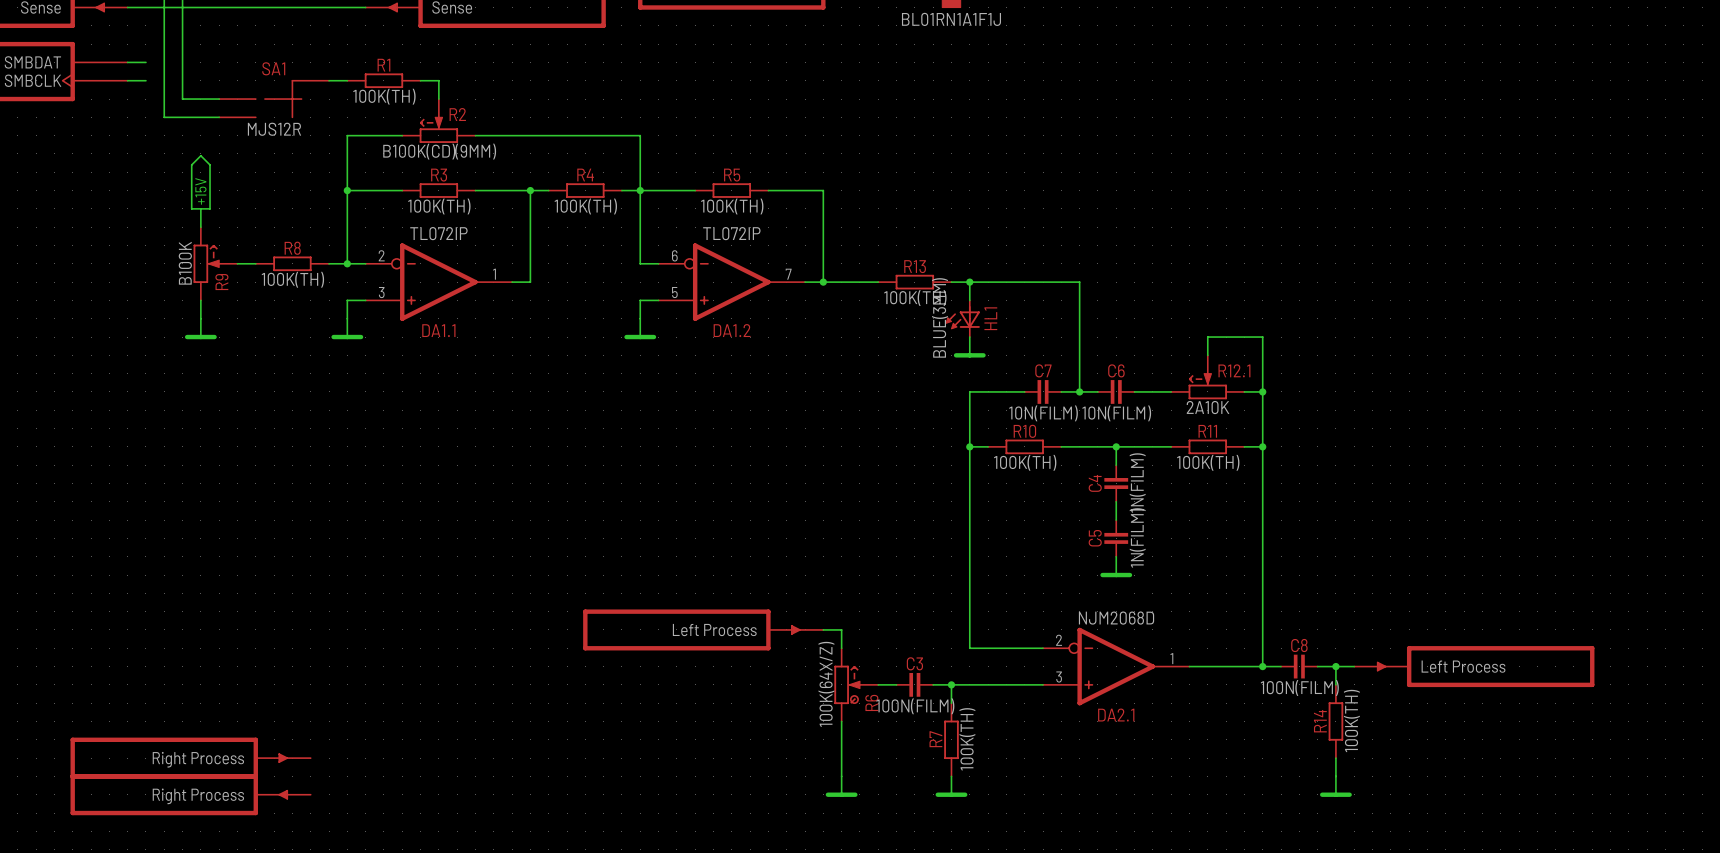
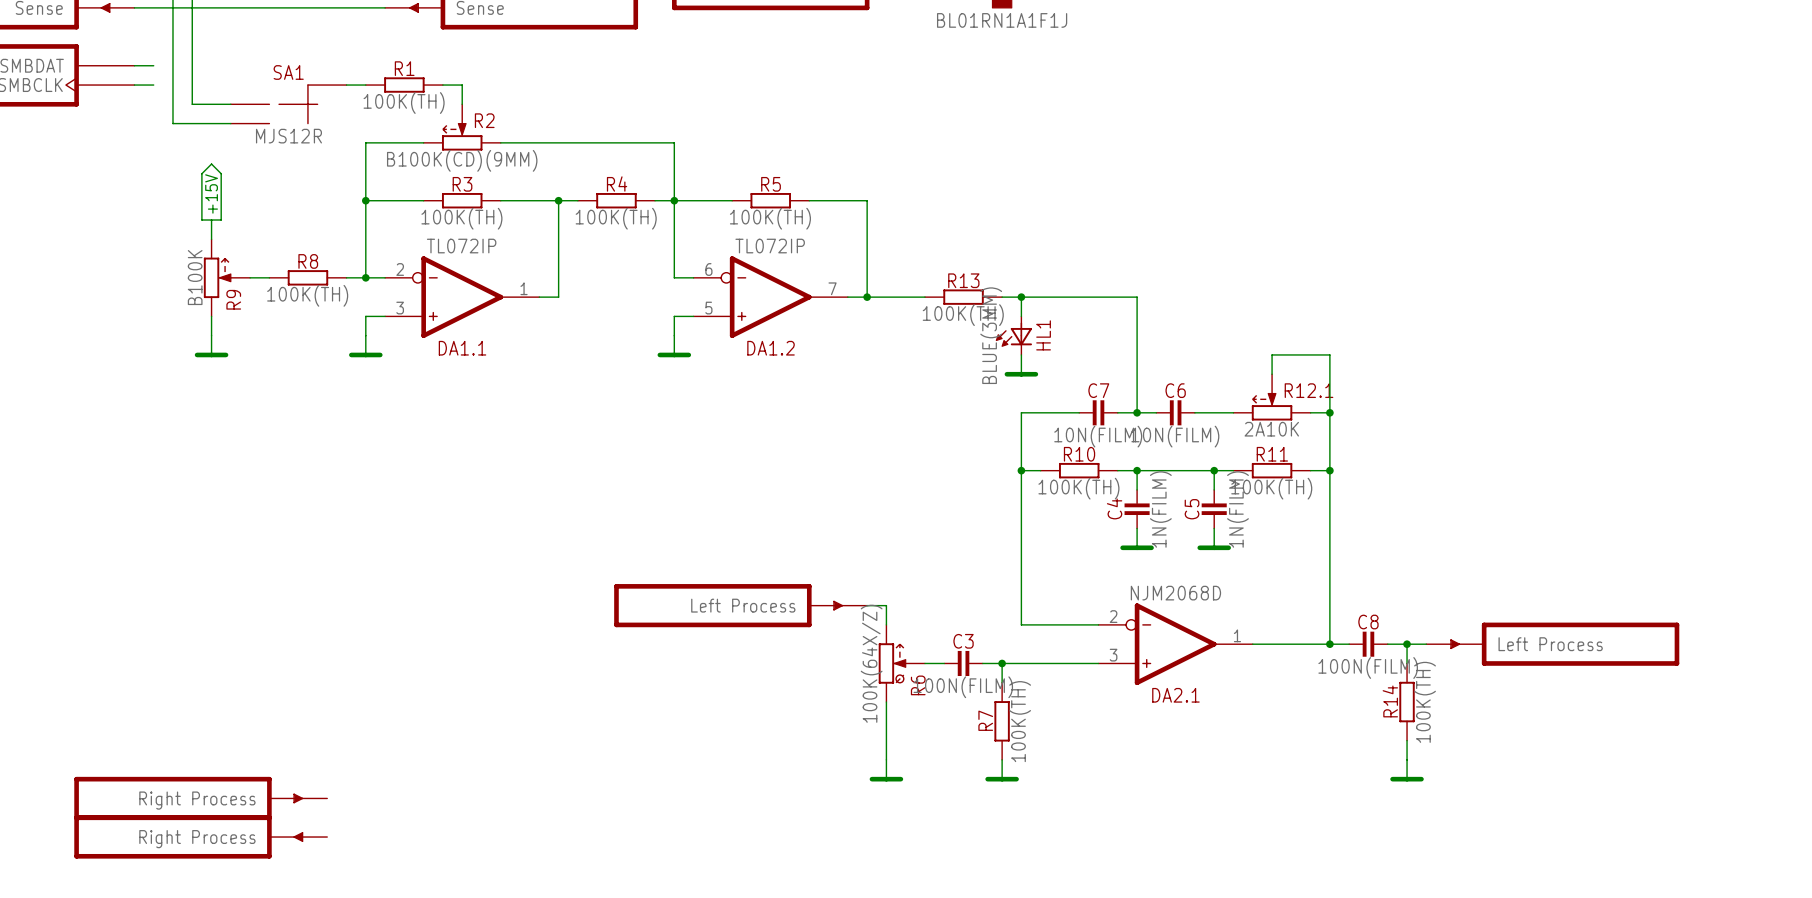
junction: none -> (1137, 470)
wire: (1116, 446) (1116, 465) -> (1214, 470) (1214, 489)
junction: (1116, 446) -> none
junction: none -> (1214, 470)
C4 position: (1116, 483) -> (1137, 509)
wire: (1116, 501) (1116, 520) -> (1137, 470) (1137, 489)
power symbol: none -> (1137, 539)
power symbol: none -> (1214, 539)
C5 position: (1116, 538) -> (1214, 509)
power symbol: (1116, 566) -> none
wire: (969, 593) (969, 648) (1043, 648) -> (1021, 624) (1098, 624)
wire: (1262, 611) (1262, 666) -> none
junction: none -> (1329, 644)
junction: none -> (1407, 644)
part position: (703, 629) -> (740, 605)
wire: (823, 629) (841, 629) (841, 648) -> (867, 605) (886, 605) (886, 624)
junction: none -> (1002, 663)
DA2.1 position: (1116, 666) -> (1175, 644)
wire: (1189, 666) (1281, 666) -> (1252, 644) (1349, 644)
junction: (1262, 666) -> none
C8 position: (1299, 666) -> (1368, 644)
wire: (1317, 666) (1354, 666) -> (1387, 644) (1426, 644)
wire: (1335, 666) (1335, 684) -> (1407, 644) (1407, 663)
junction: (1335, 666) -> none
part position: (1474, 666) -> (1552, 644)
R6 position: (856, 684) -> (901, 663)
wire: (878, 684) (896, 684) -> (924, 663) (944, 663)
C3 position: (914, 684) -> (963, 663)
wire: (933, 684) (1043, 684) -> (982, 663) (1098, 663)
wire: (951, 684) (951, 703) -> (1002, 663) (1002, 682)
junction: (951, 684) -> none
wire: (841, 721) (841, 776) -> (886, 759) (886, 702)
R14 position: (1335, 721) -> (1407, 702)
R7 position: (951, 739) -> (1002, 721)
wire: (1335, 758) (1335, 776) -> (1407, 740) (1407, 759)
power symbol position: (841, 786) -> (886, 770)
power symbol position: (951, 786) -> (1002, 770)
power symbol position: (1335, 786) -> (1407, 770)

